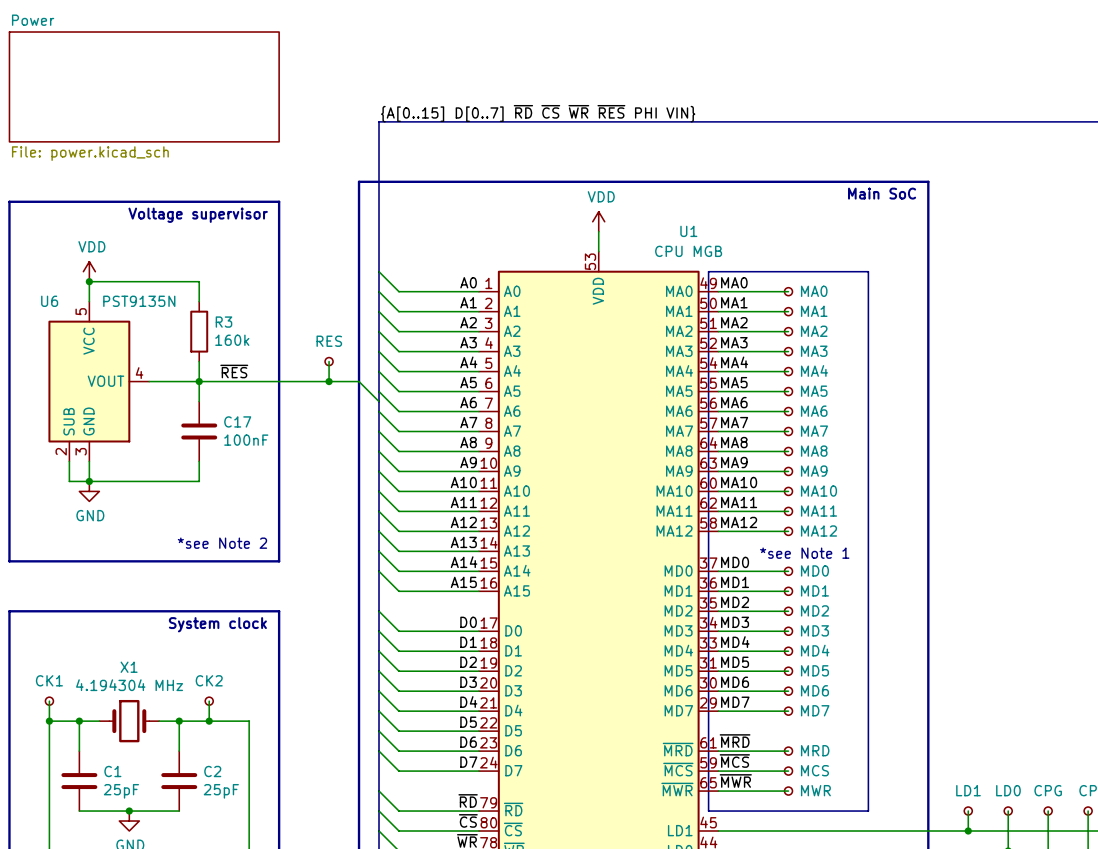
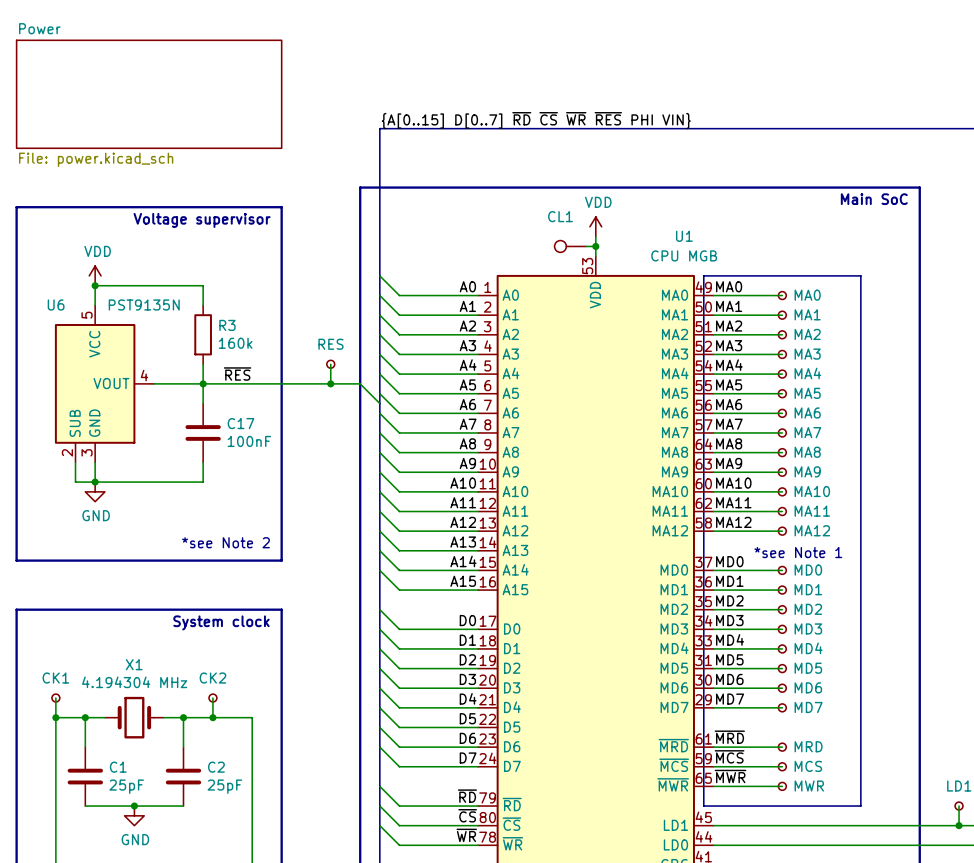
CL1: none -> (570, 246)
wire: none -> (585, 246) (595, 246)
junction: none -> (595, 246)

